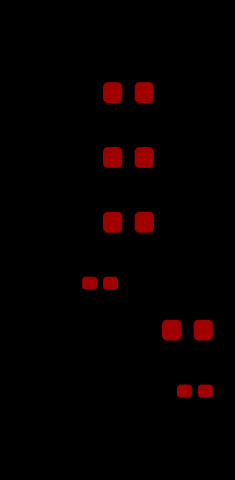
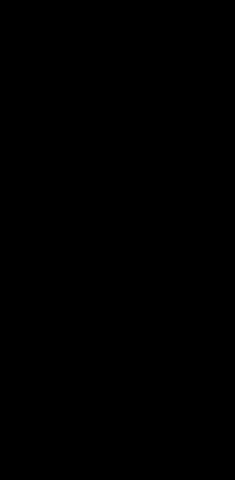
part: (128, 92) -> none
part: (128, 157) -> none
part: (128, 222) -> none
part: (100, 283) -> none
part: (187, 330) -> none
part: (194, 391) -> none

